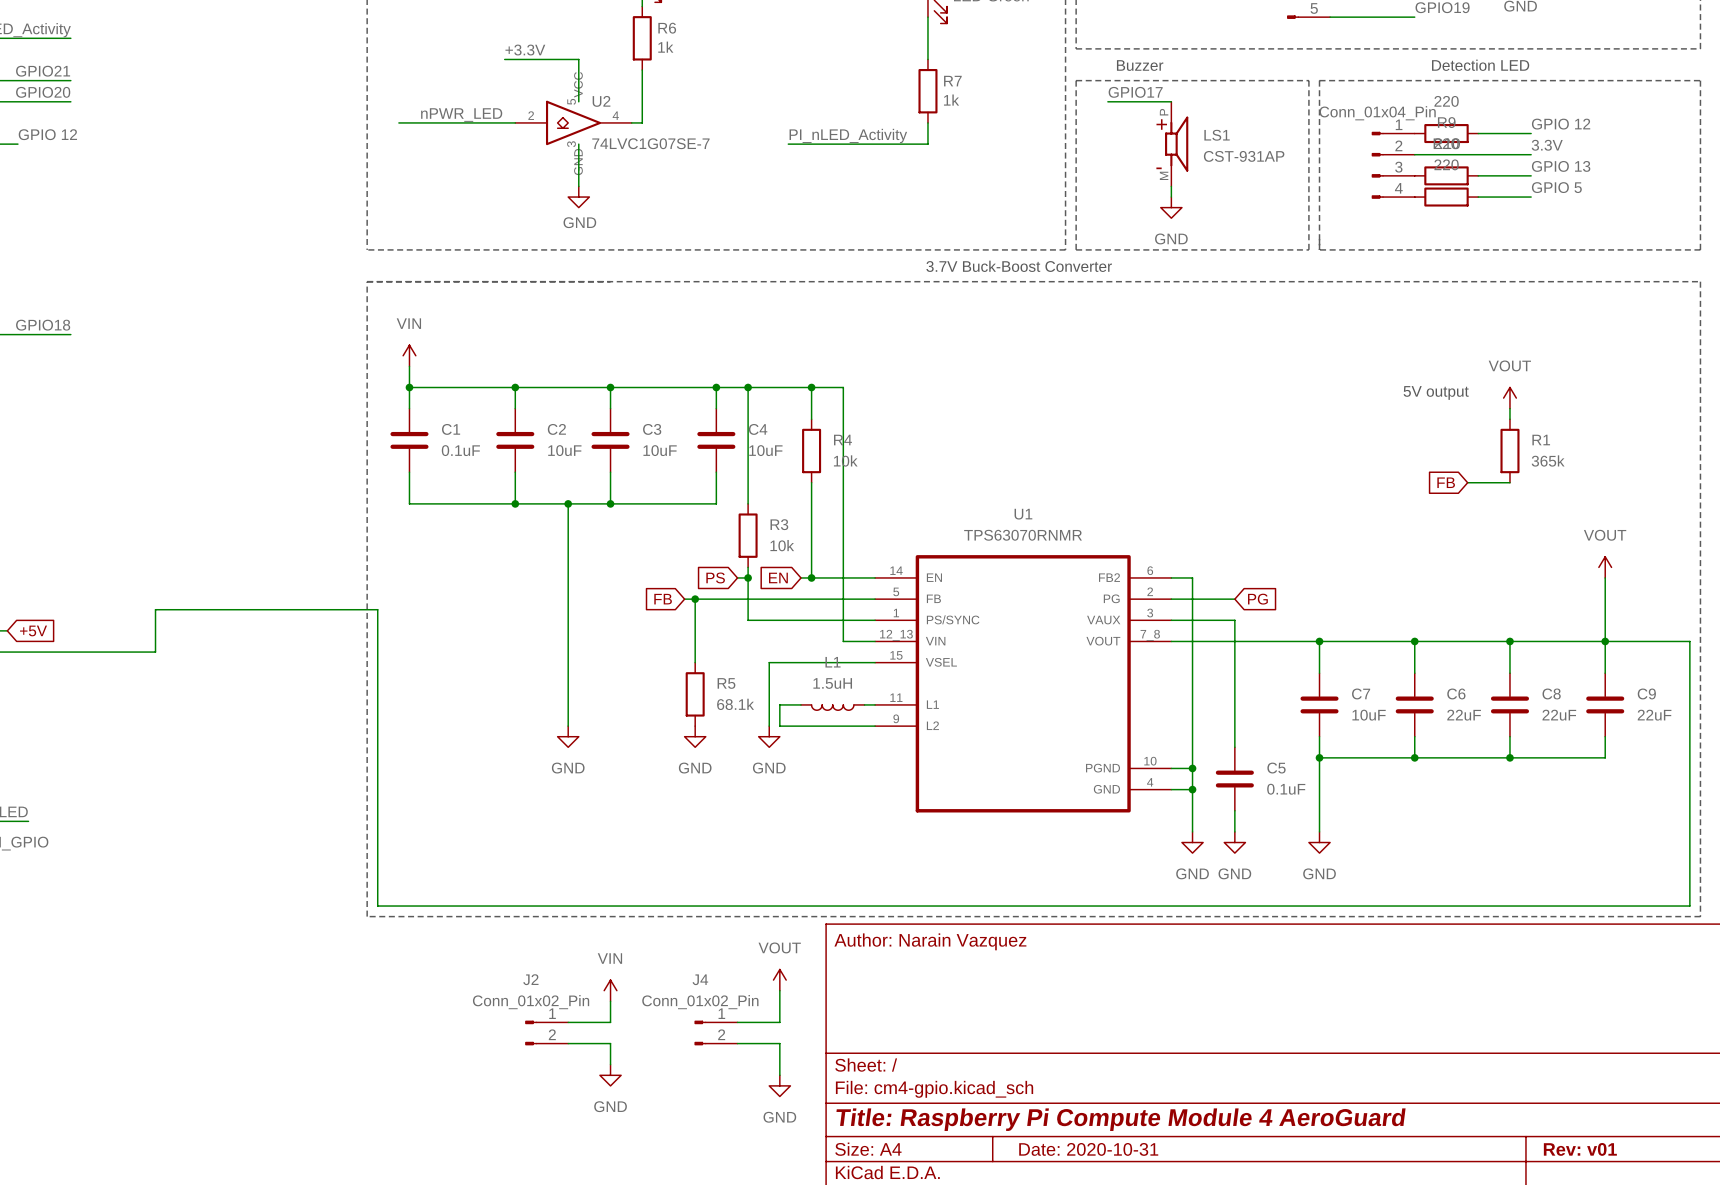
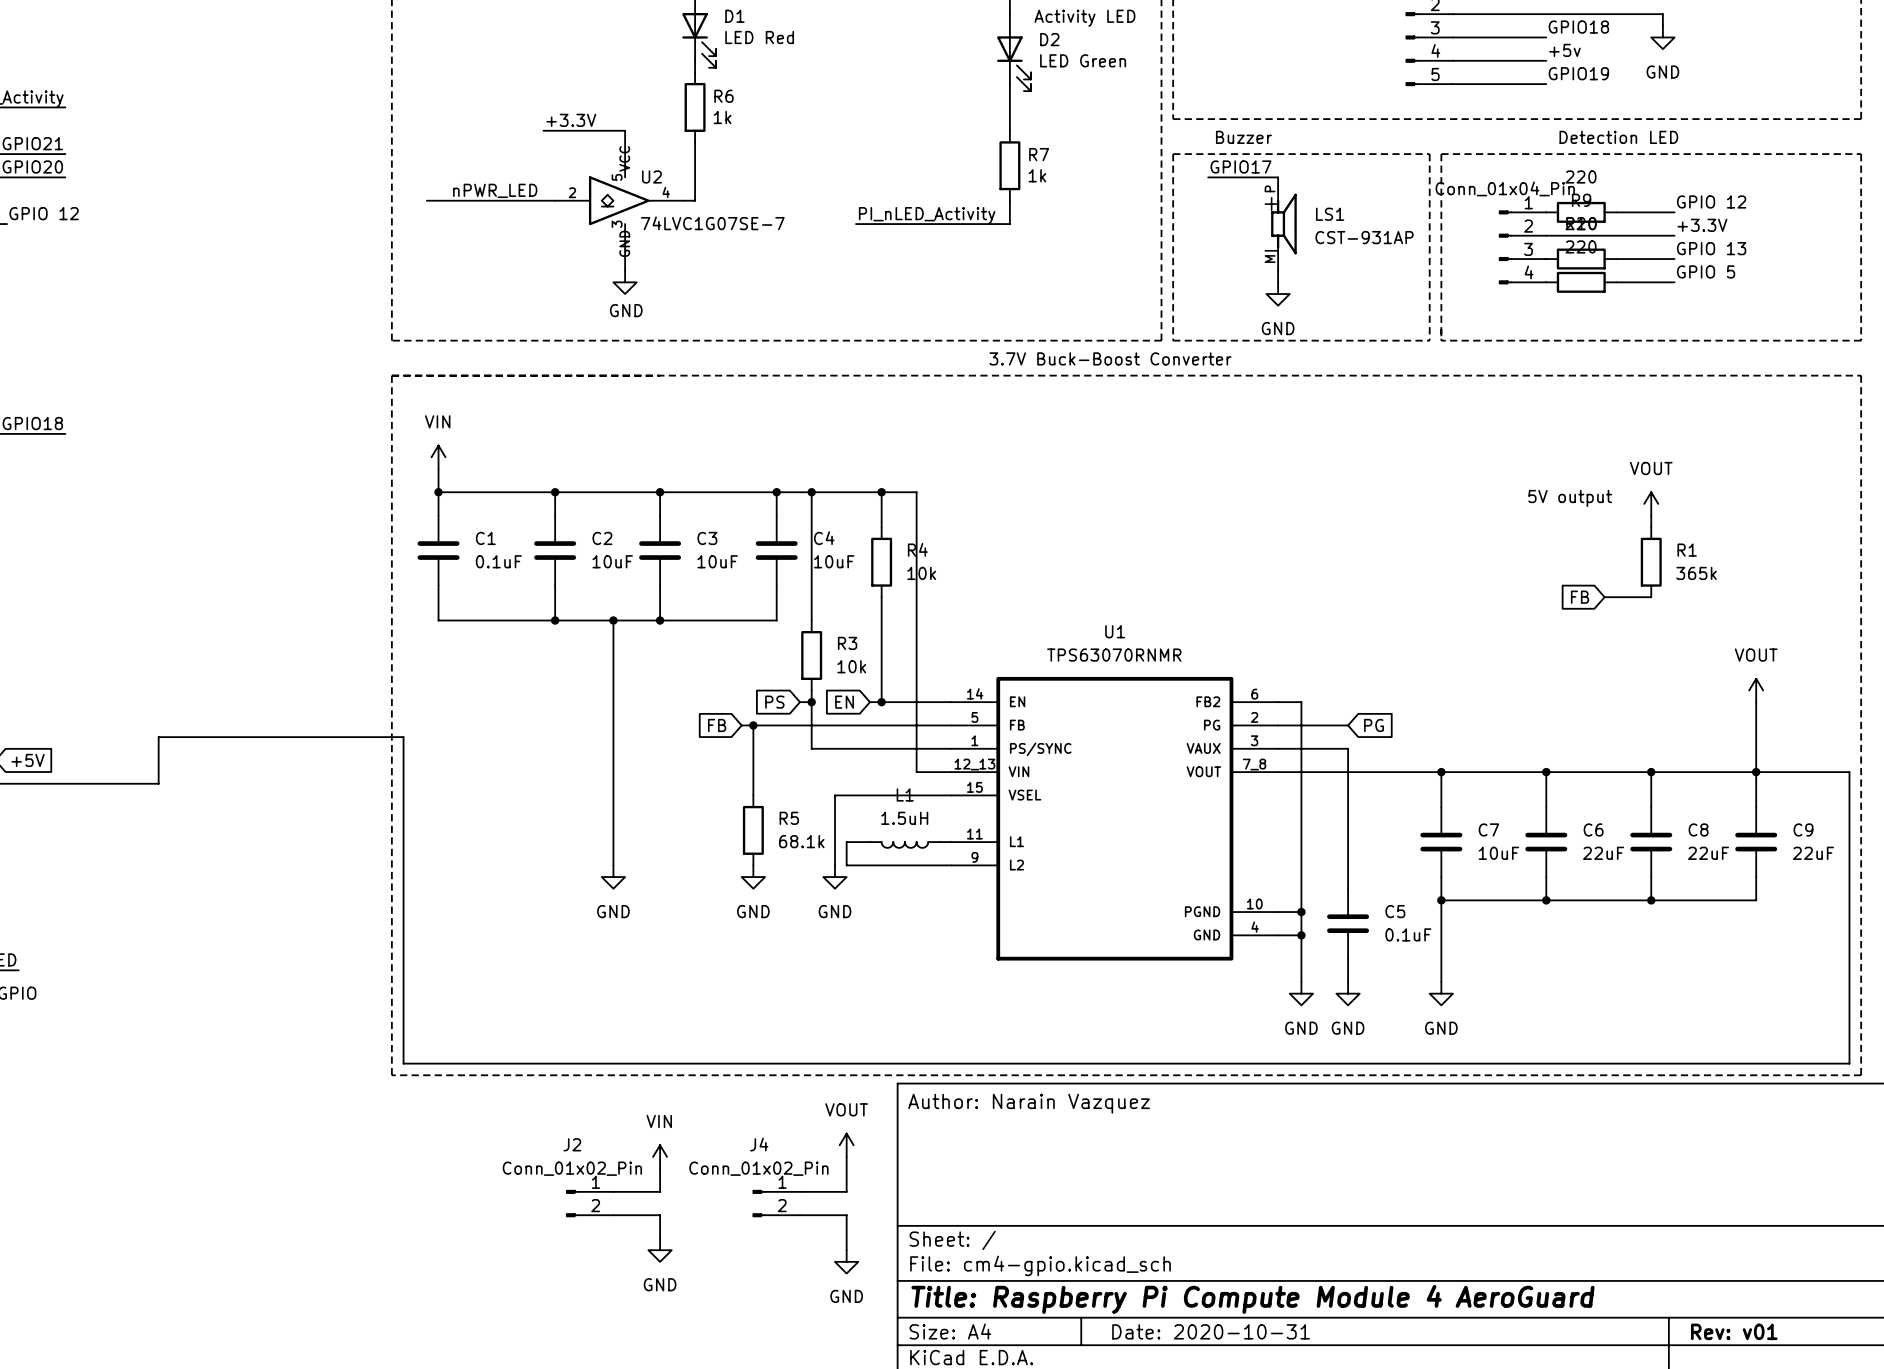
label: 3.3V (1547, 145) -> +3.3V (1702, 225)

